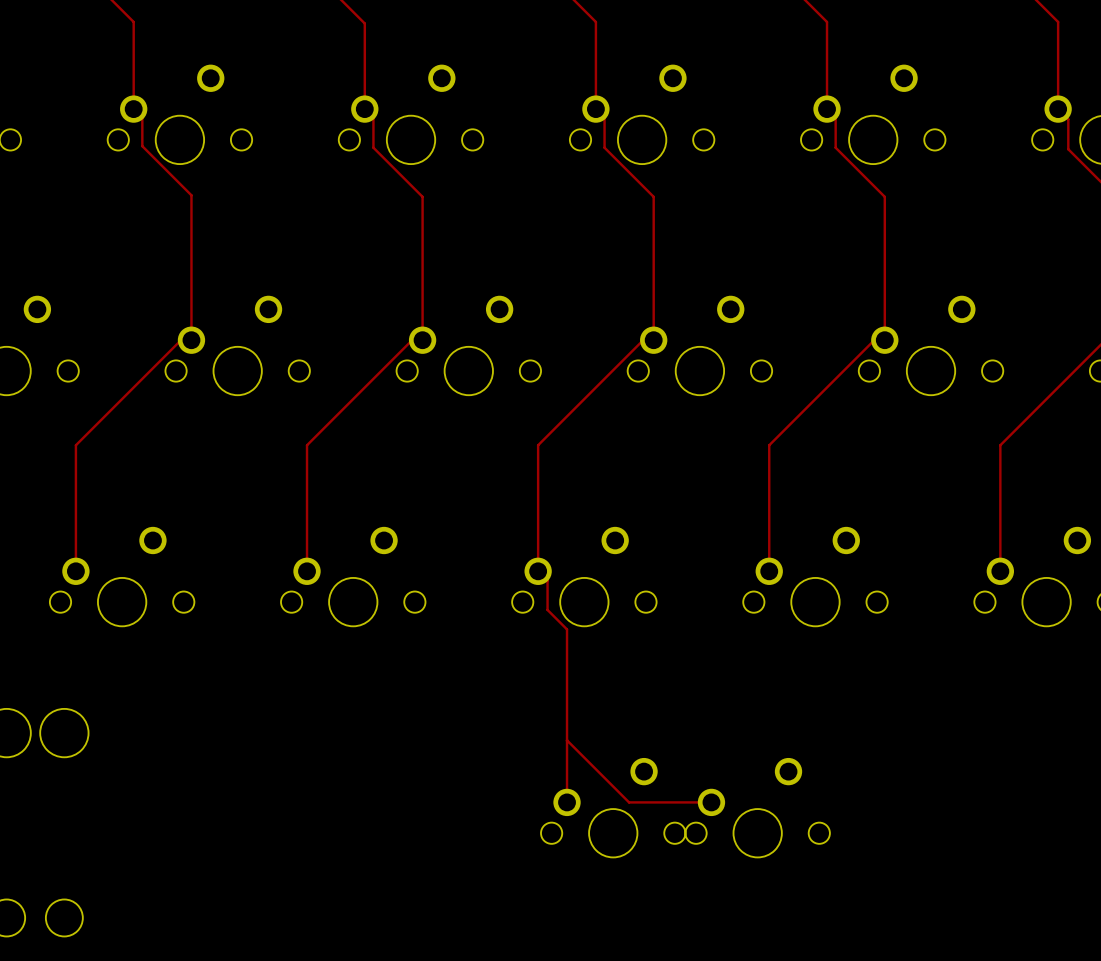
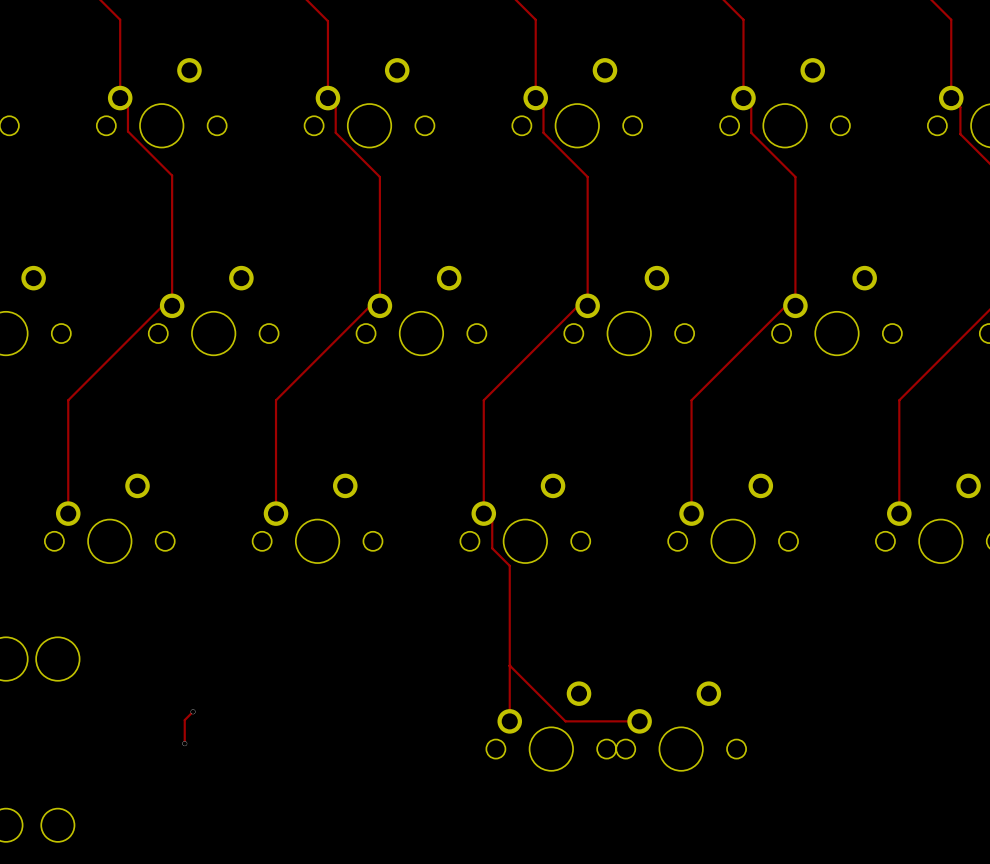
track: none -> (193, 711) (184, 720) (184, 743)
via: none -> (193, 711)
via: none -> (184, 743)

